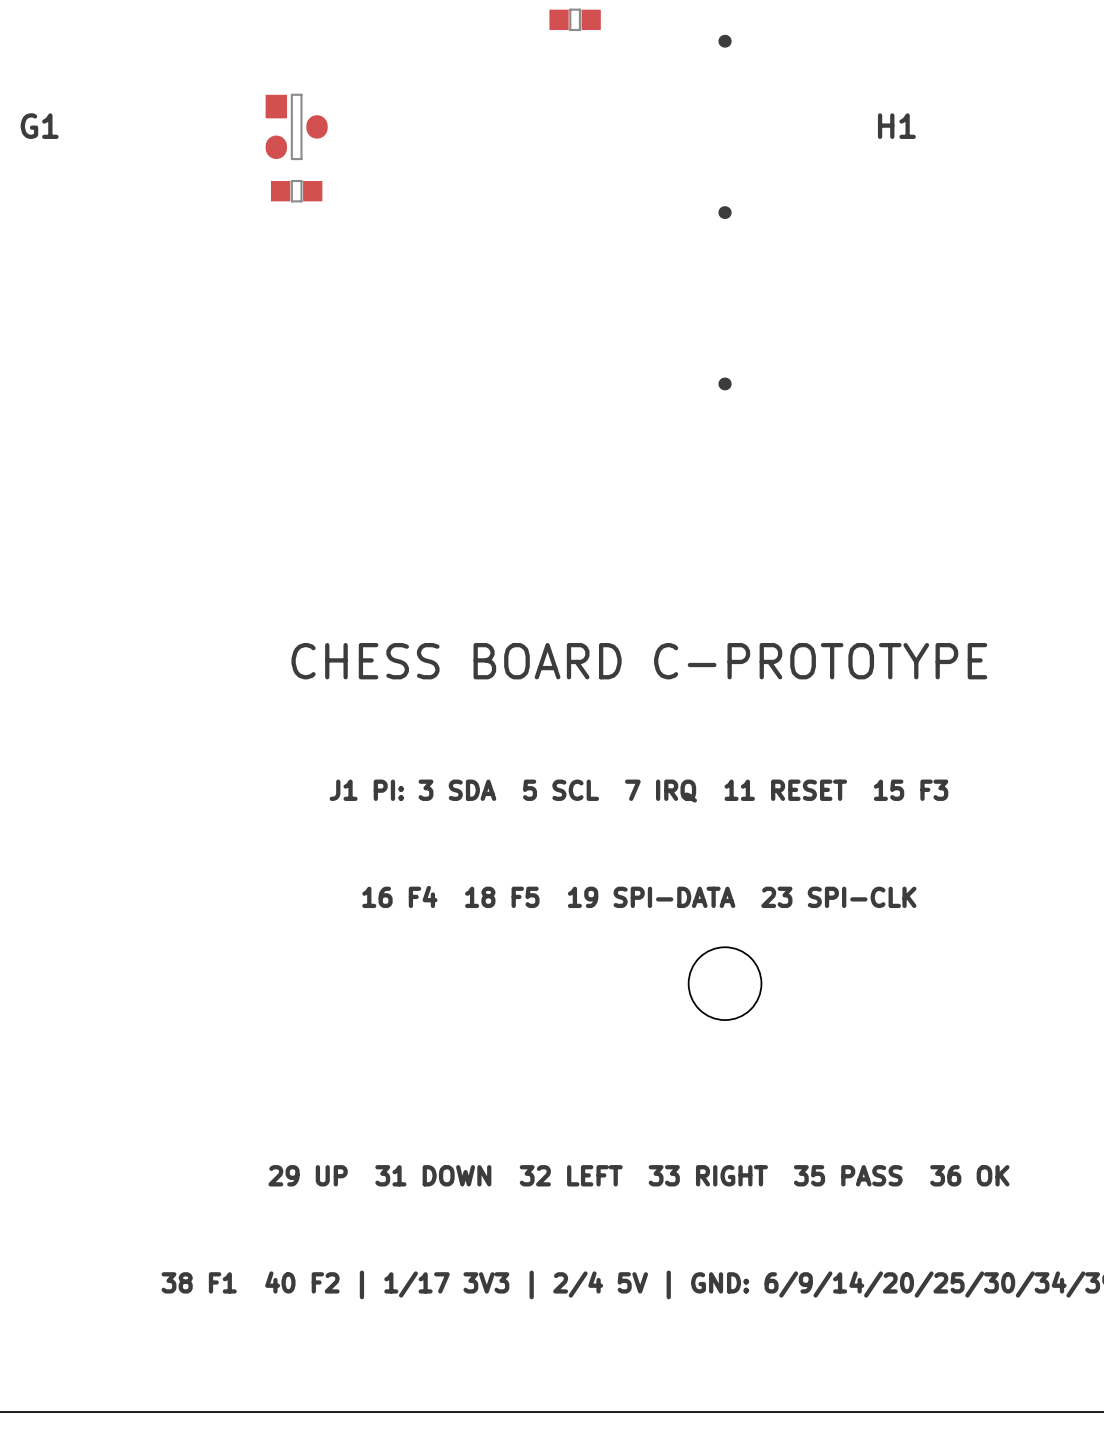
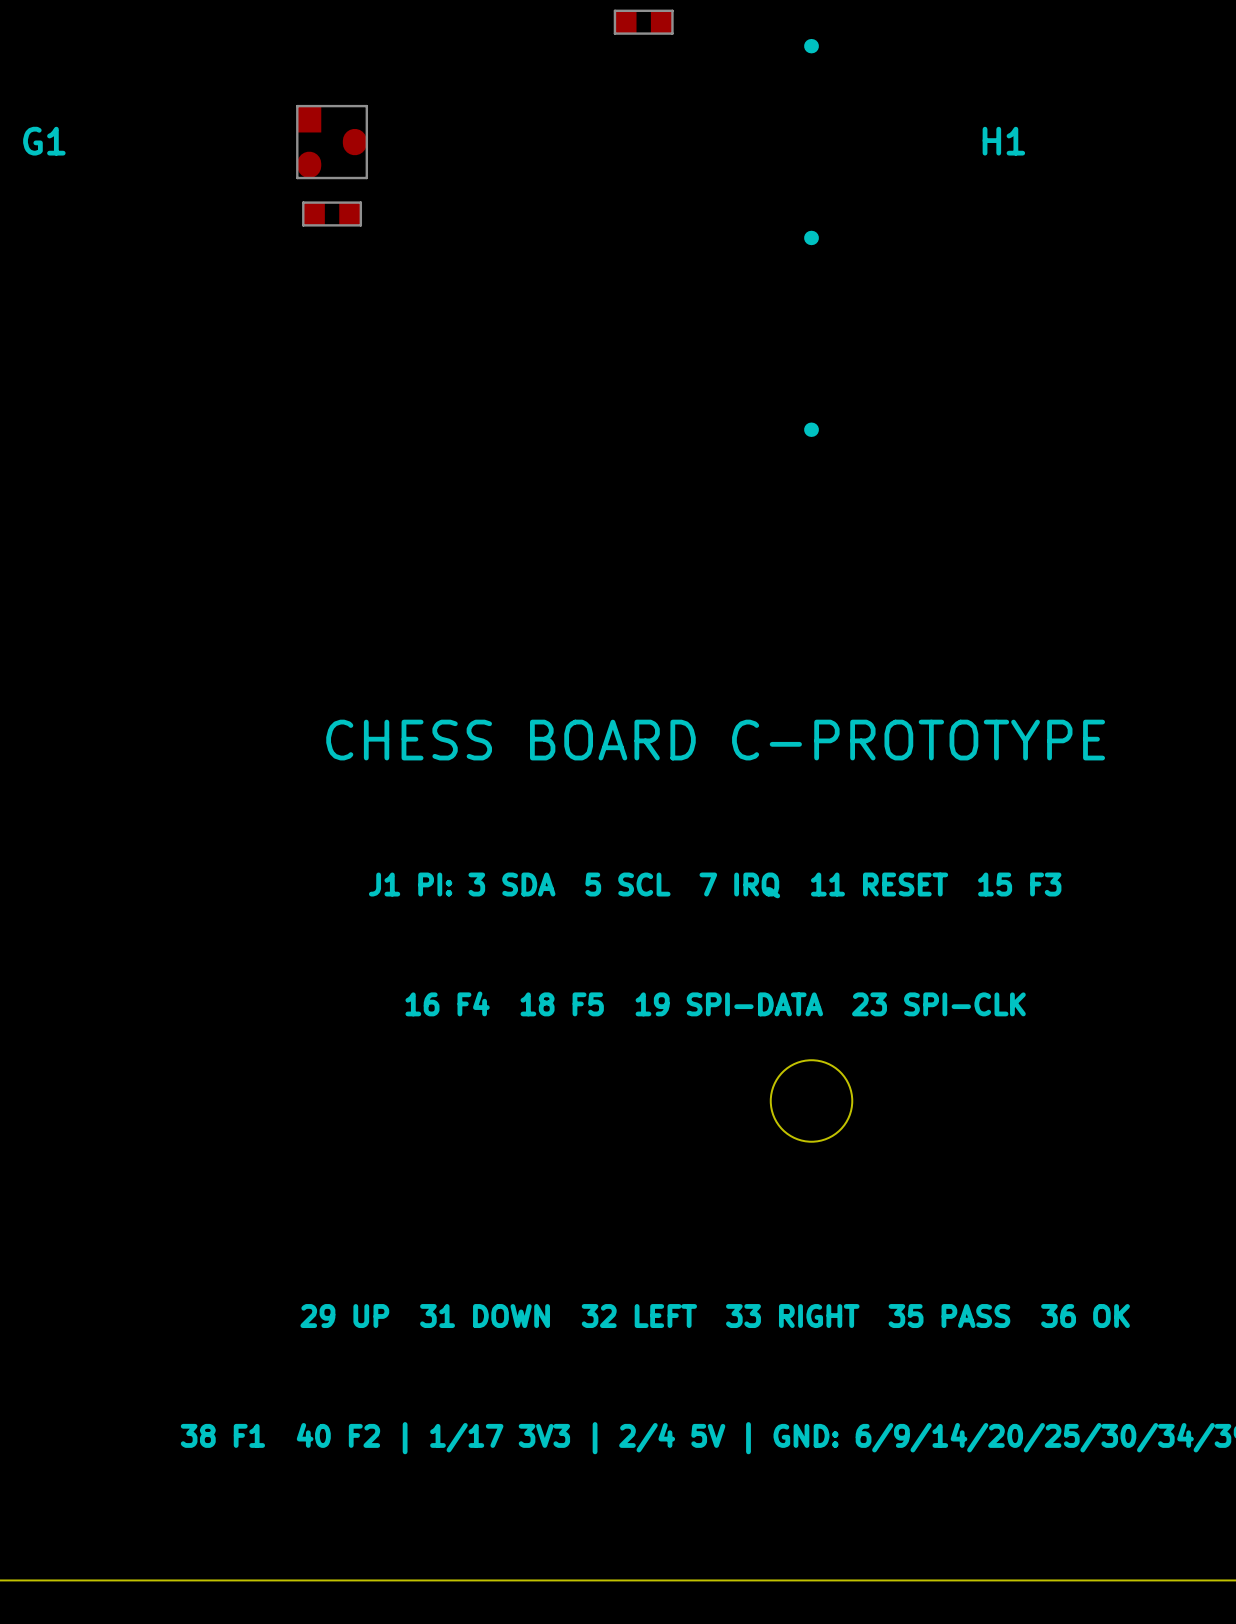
part footprint: [549, 8, 601, 32] -> [613, 9, 674, 35]
part footprint: [265, 93, 328, 161] -> [296, 104, 369, 180]
part footprint: [270, 179, 323, 203] -> [302, 201, 363, 227]

